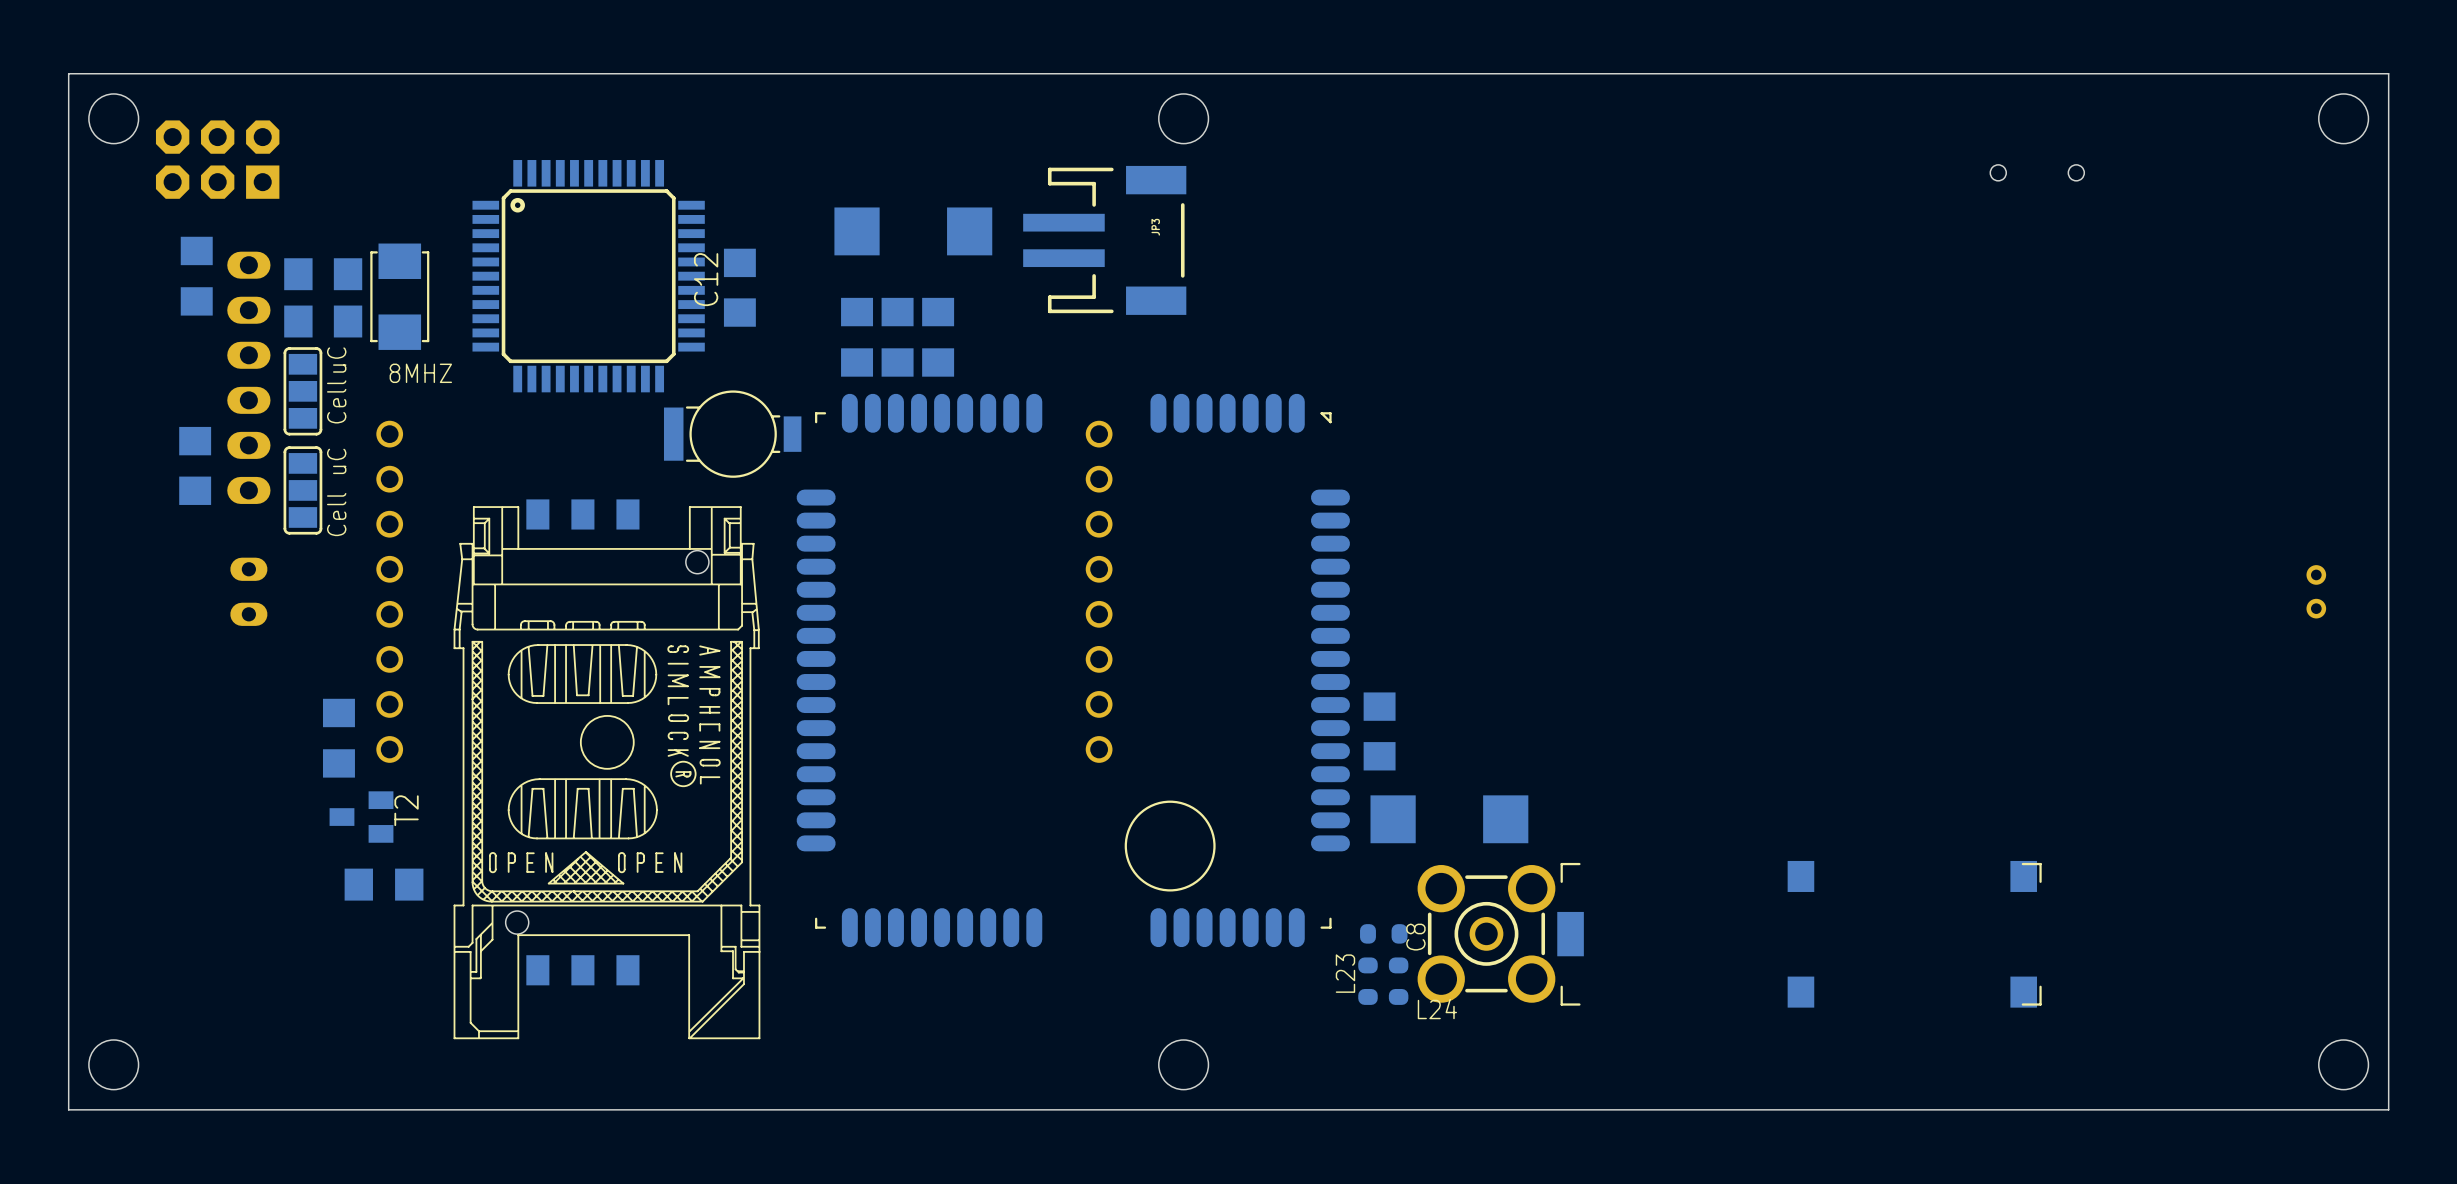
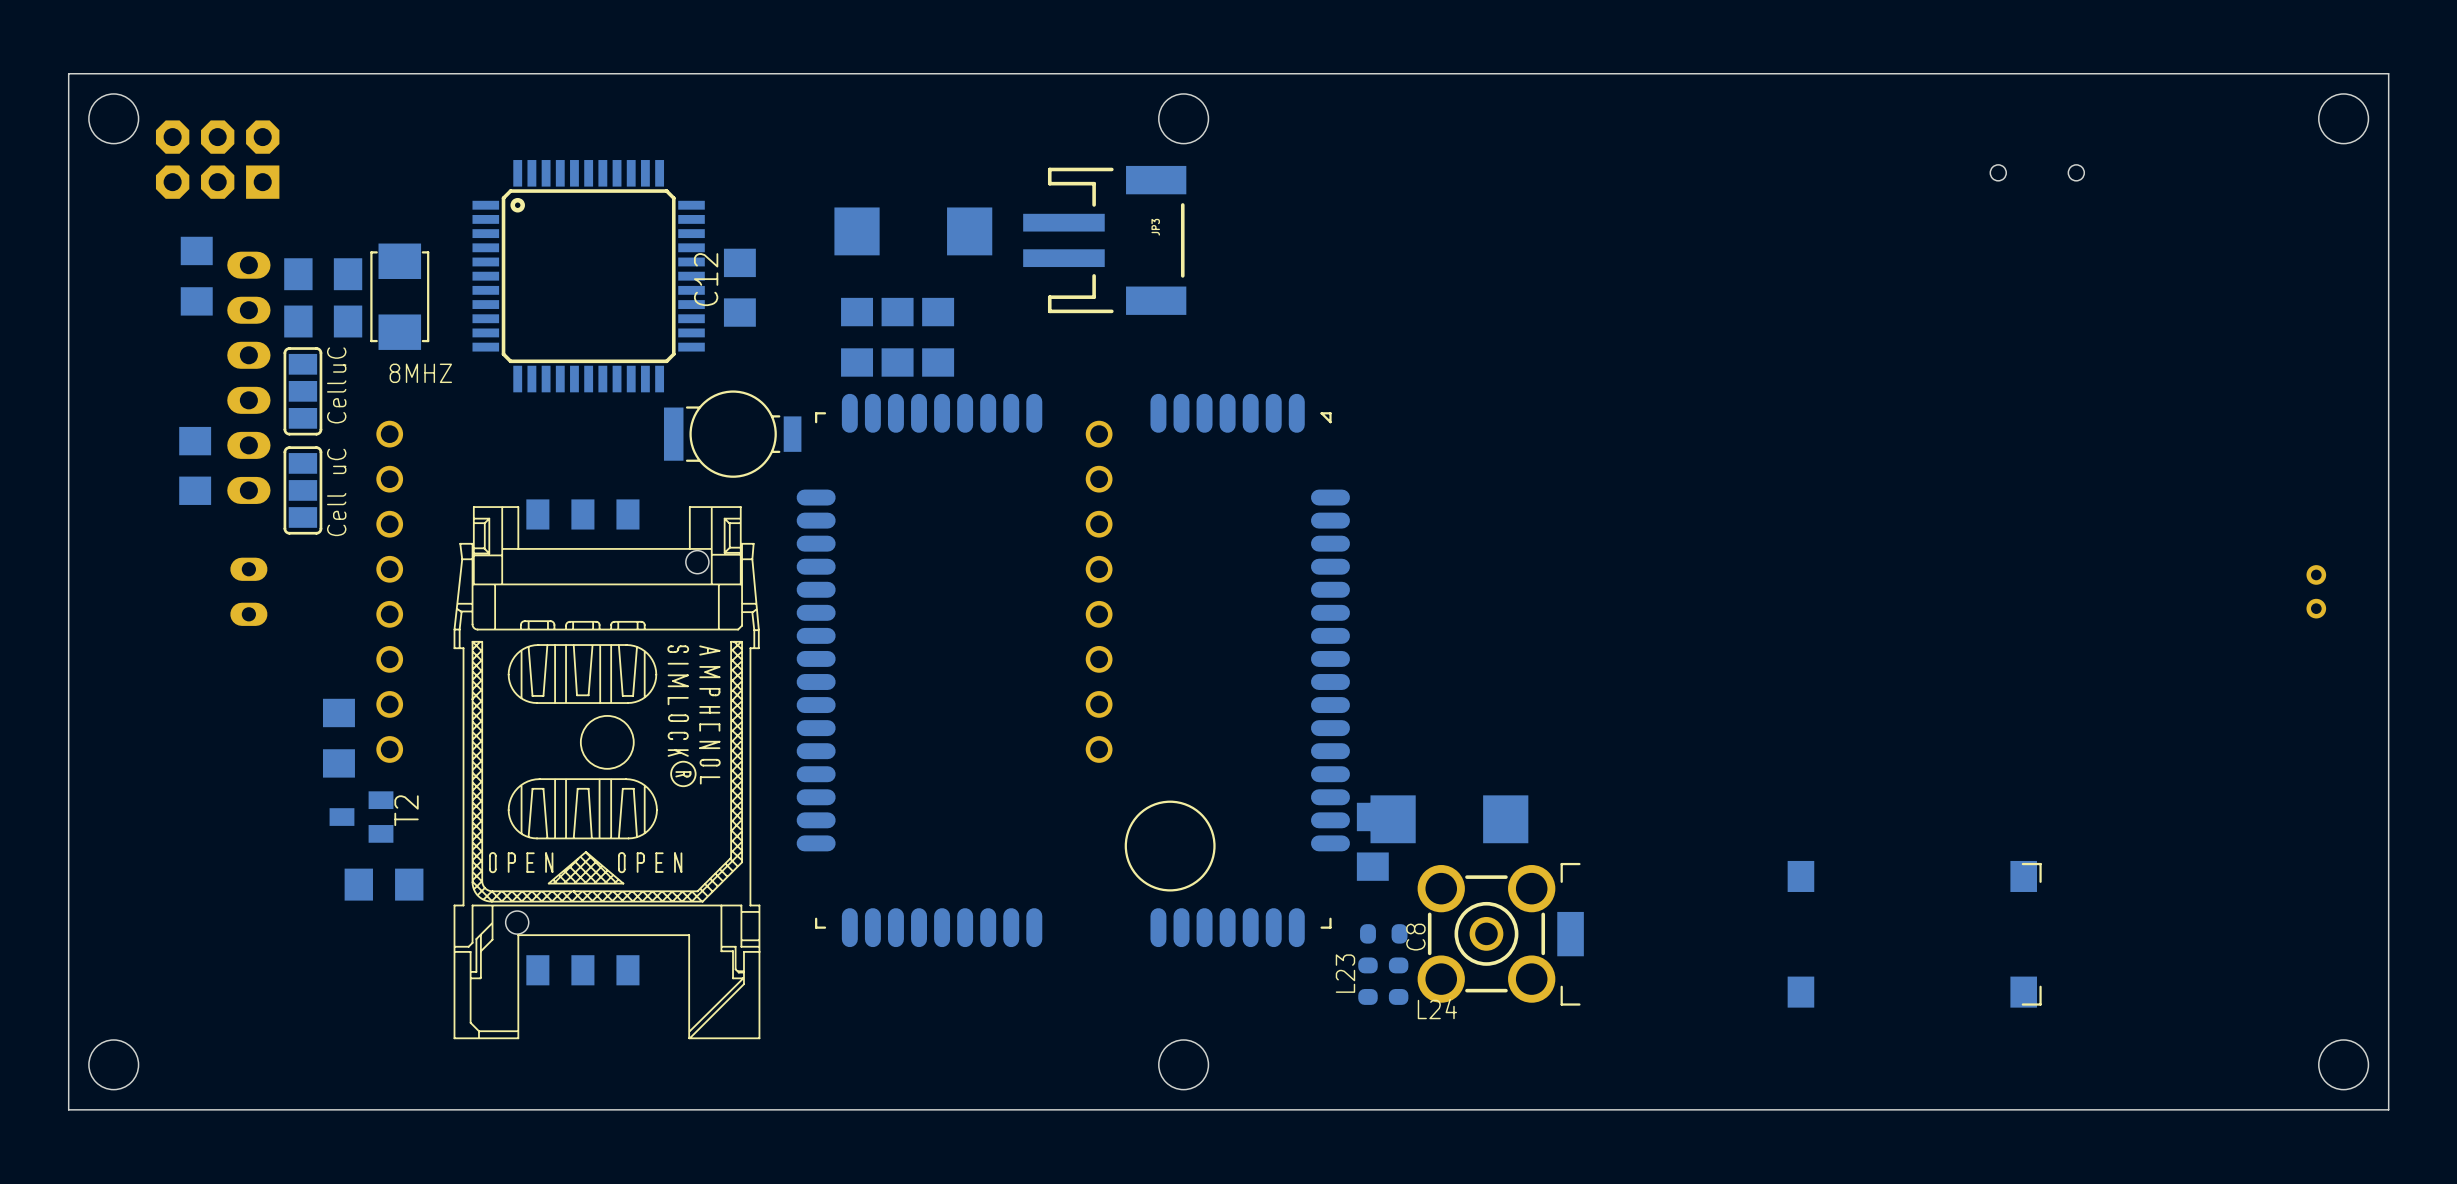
part position: (1379, 731) -> (1372, 841)

